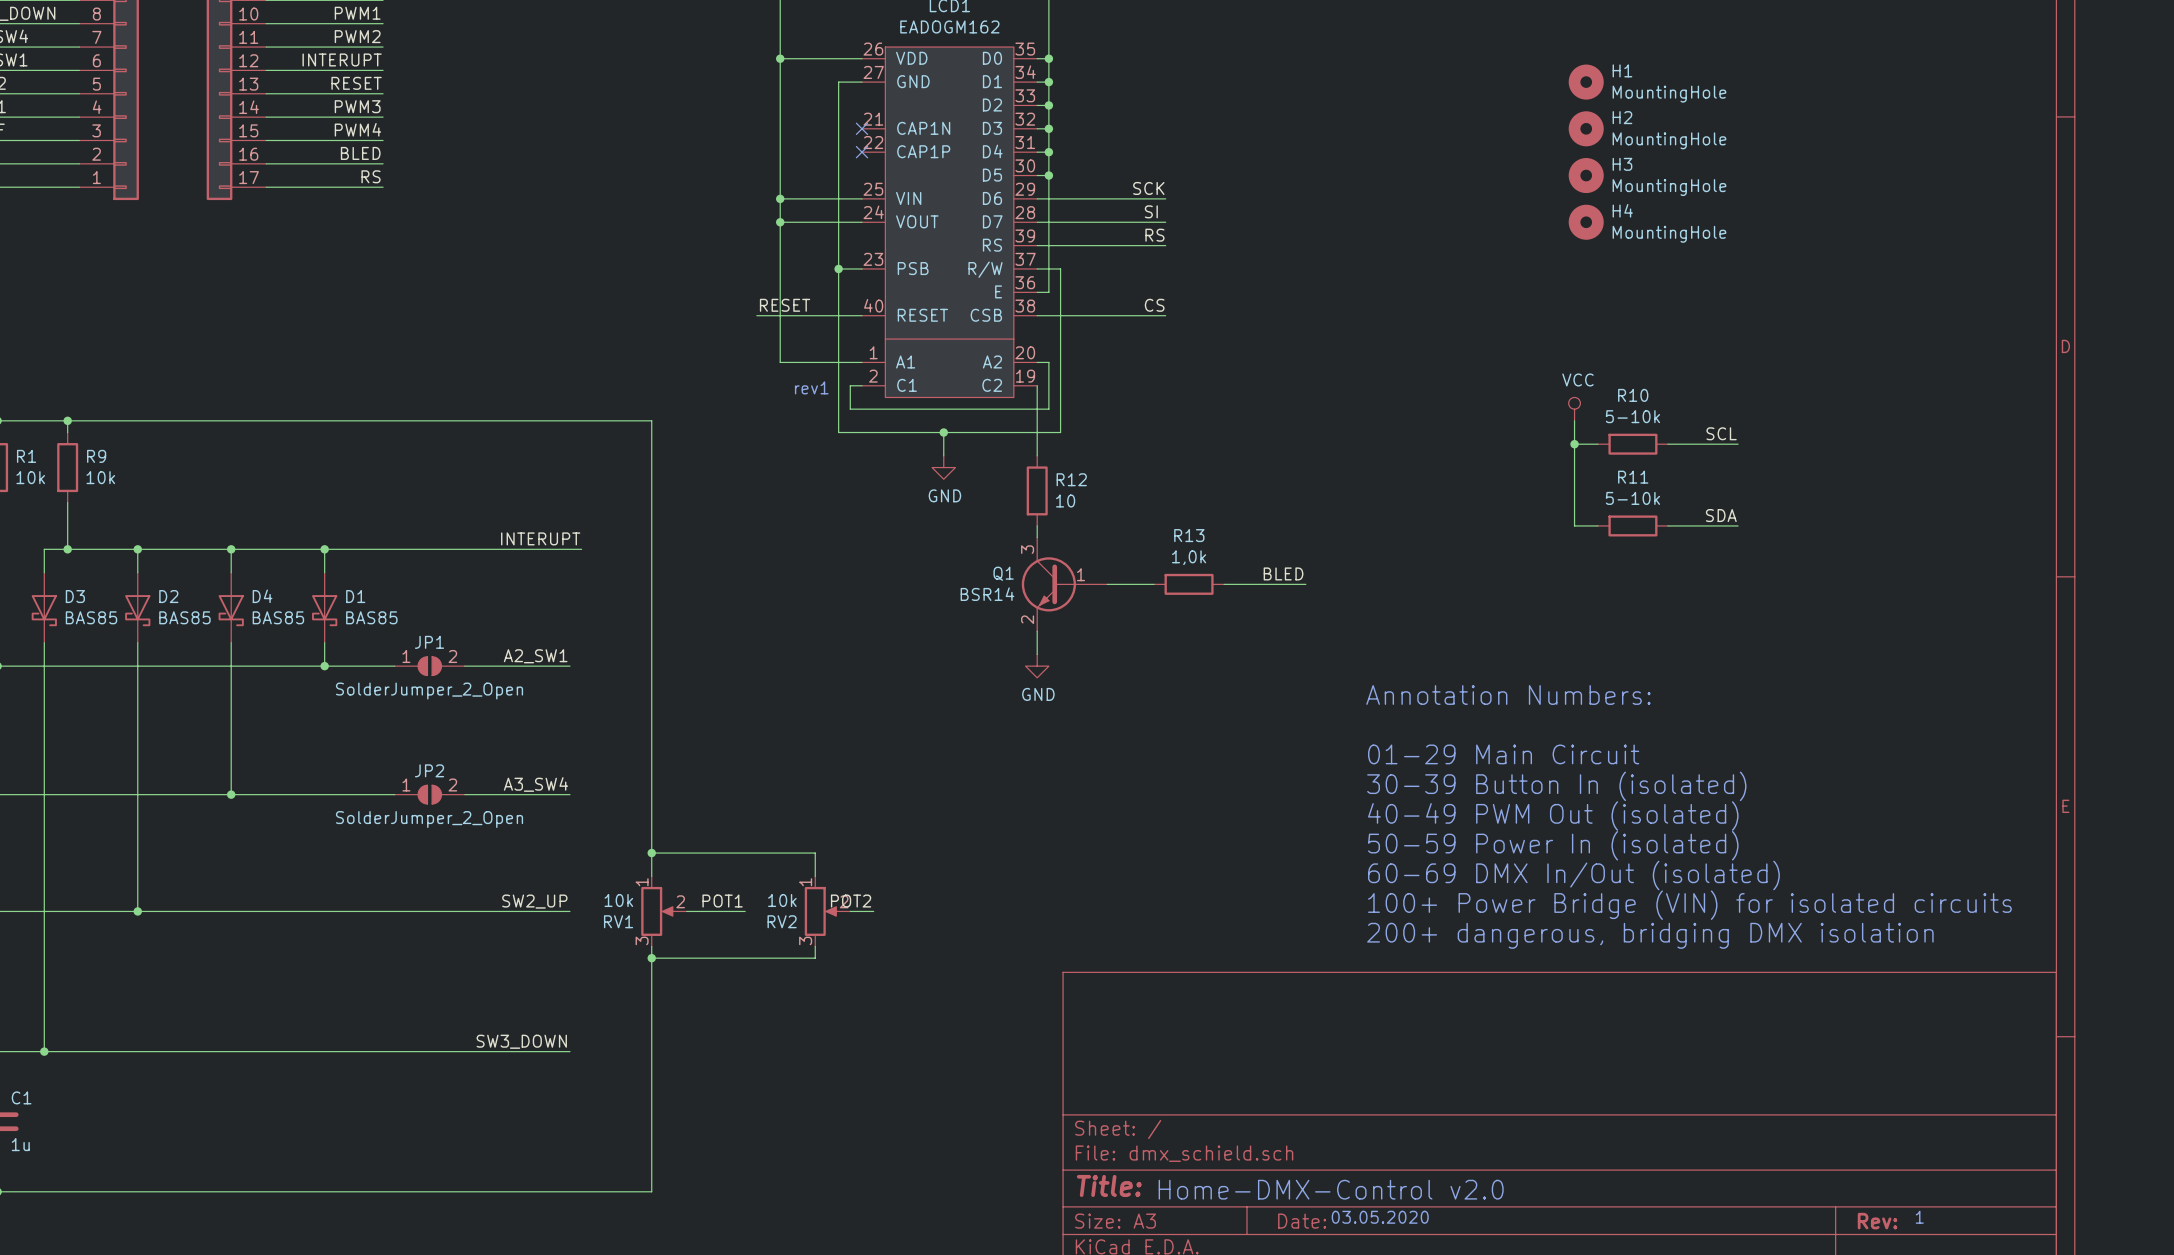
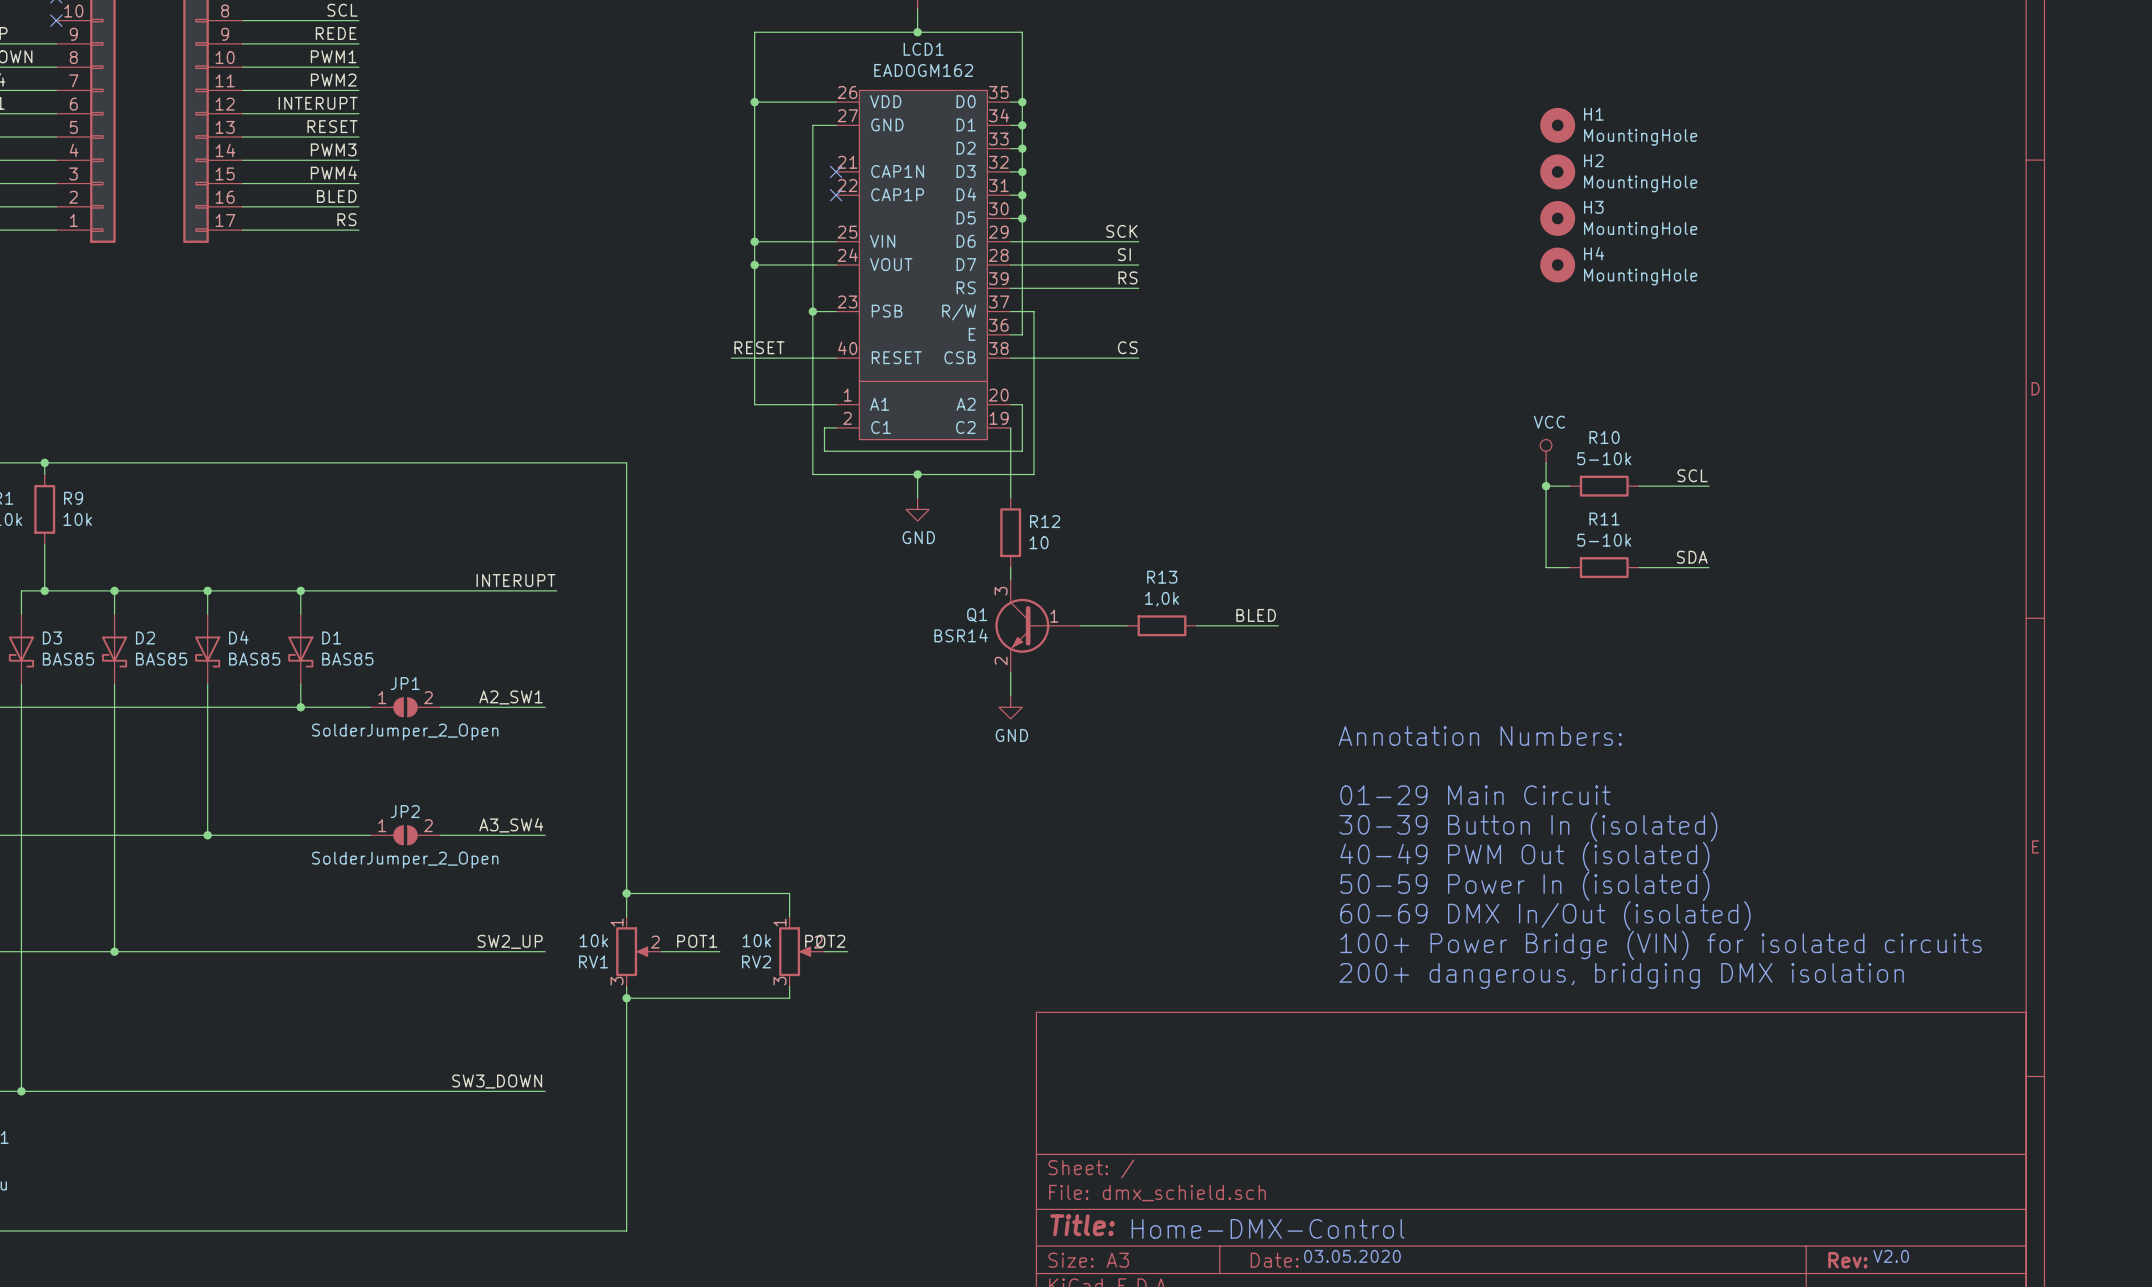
text: rev1 (811, 387) -> none
text: Home-DMX-Control v2.0 (1331, 1189) -> Home-DMX-Control (1268, 1228)
text: 1 (1919, 1217) -> none
text: none -> V2.0 (1891, 1256)

